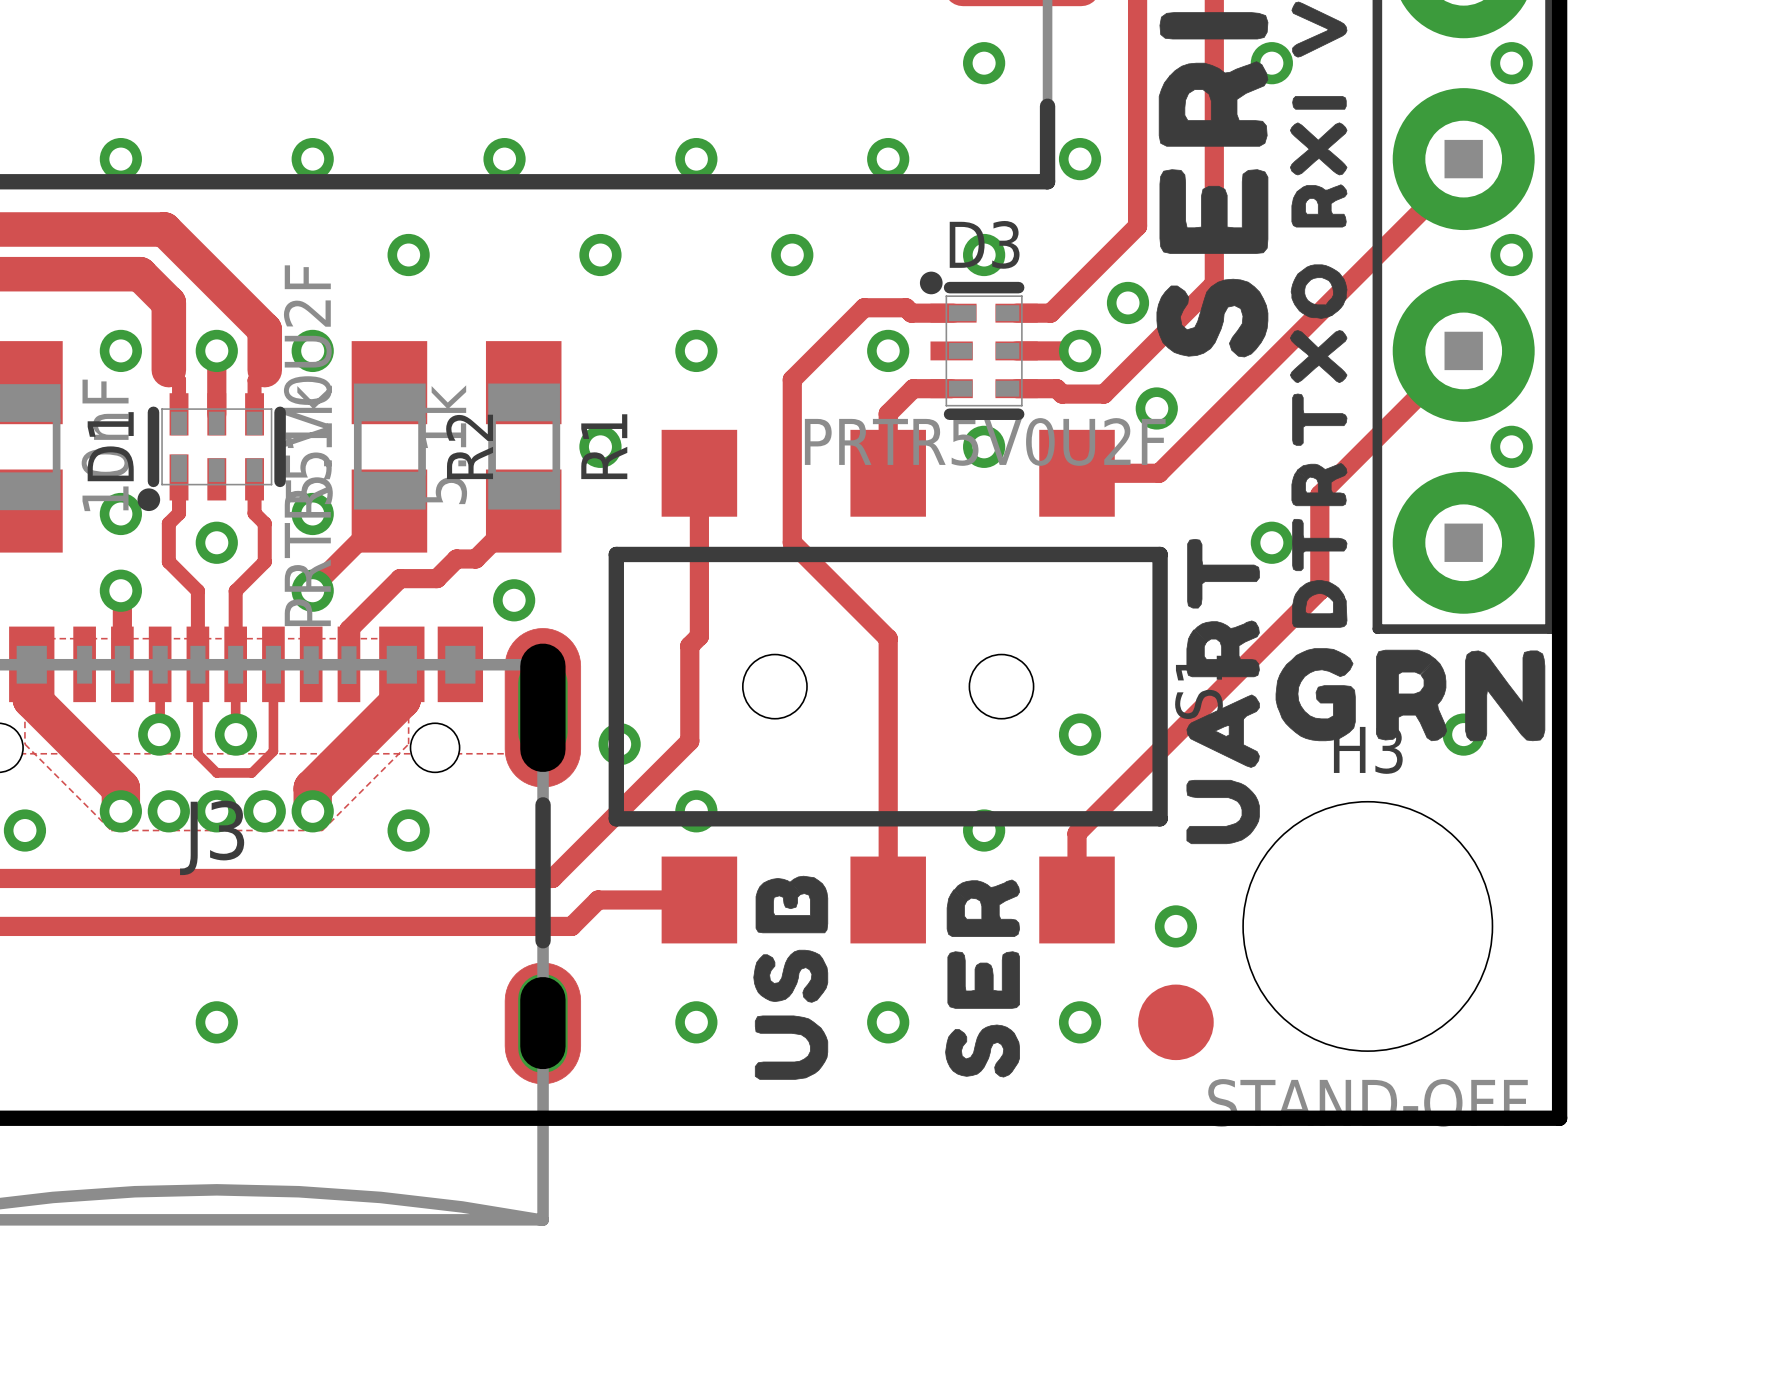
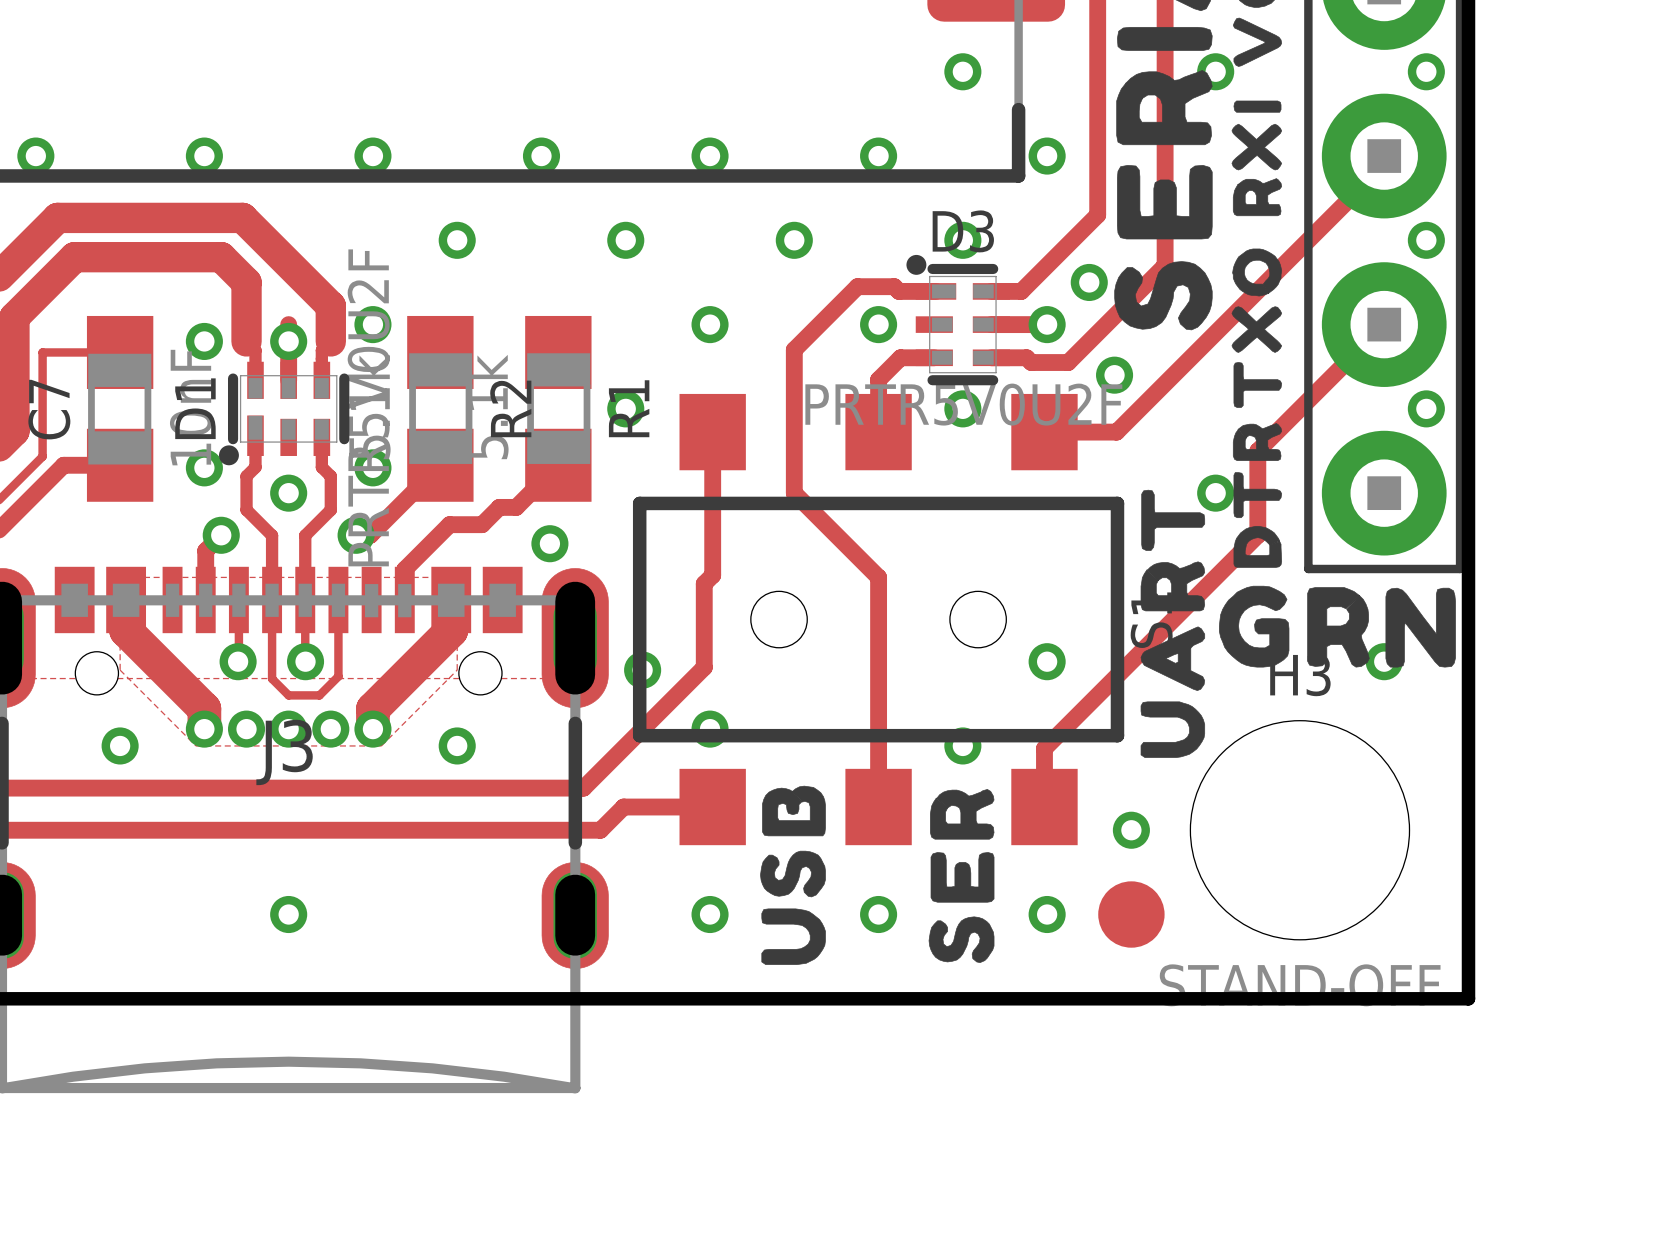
via position: (120, 350) -> (204, 341)
via position: (216, 350) -> (288, 341)
via position: (120, 590) -> (221, 535)
via position: (312, 590) -> (356, 535)

